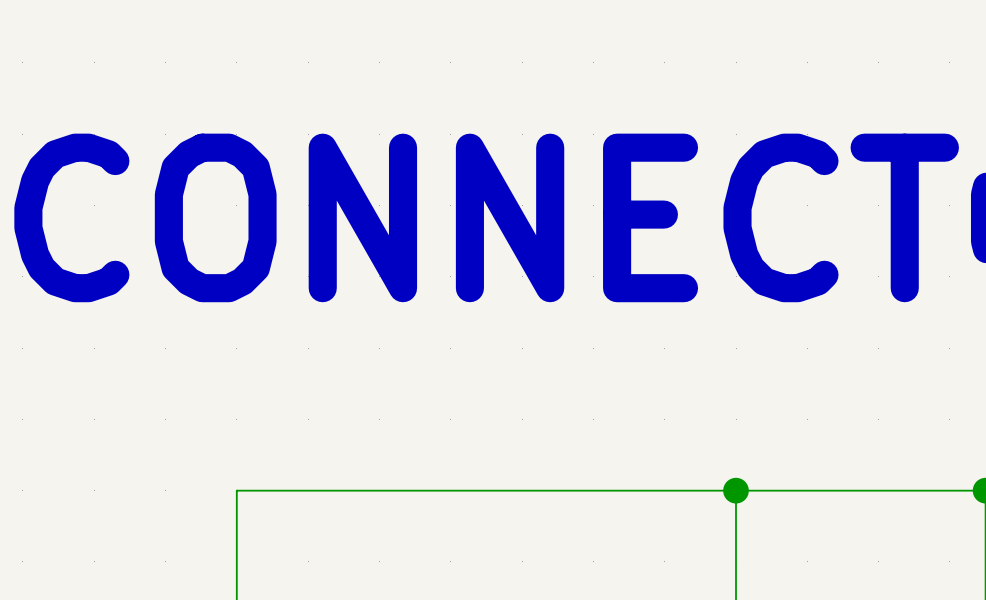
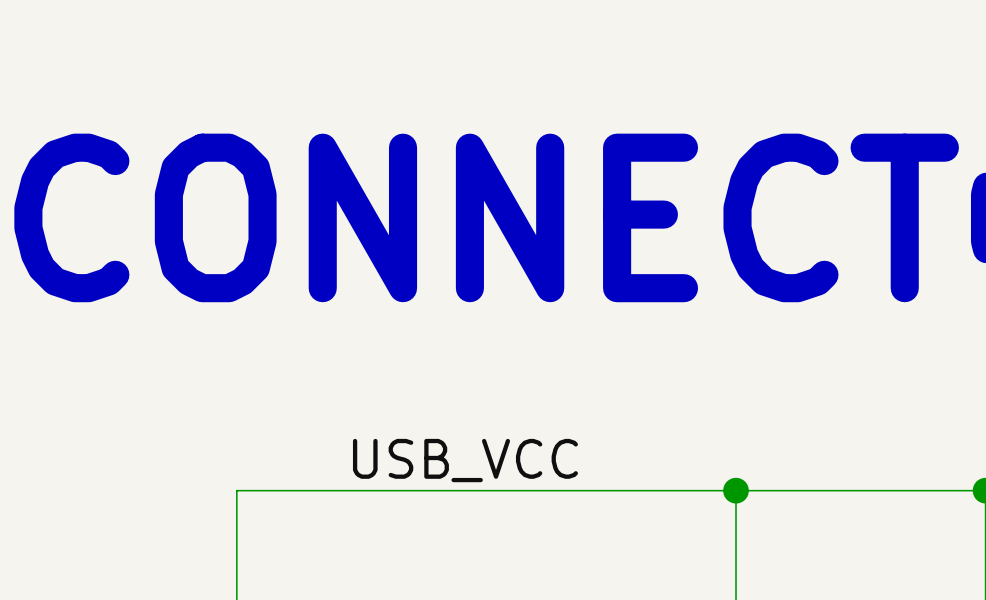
label: none -> USB_VCC (465, 460)

